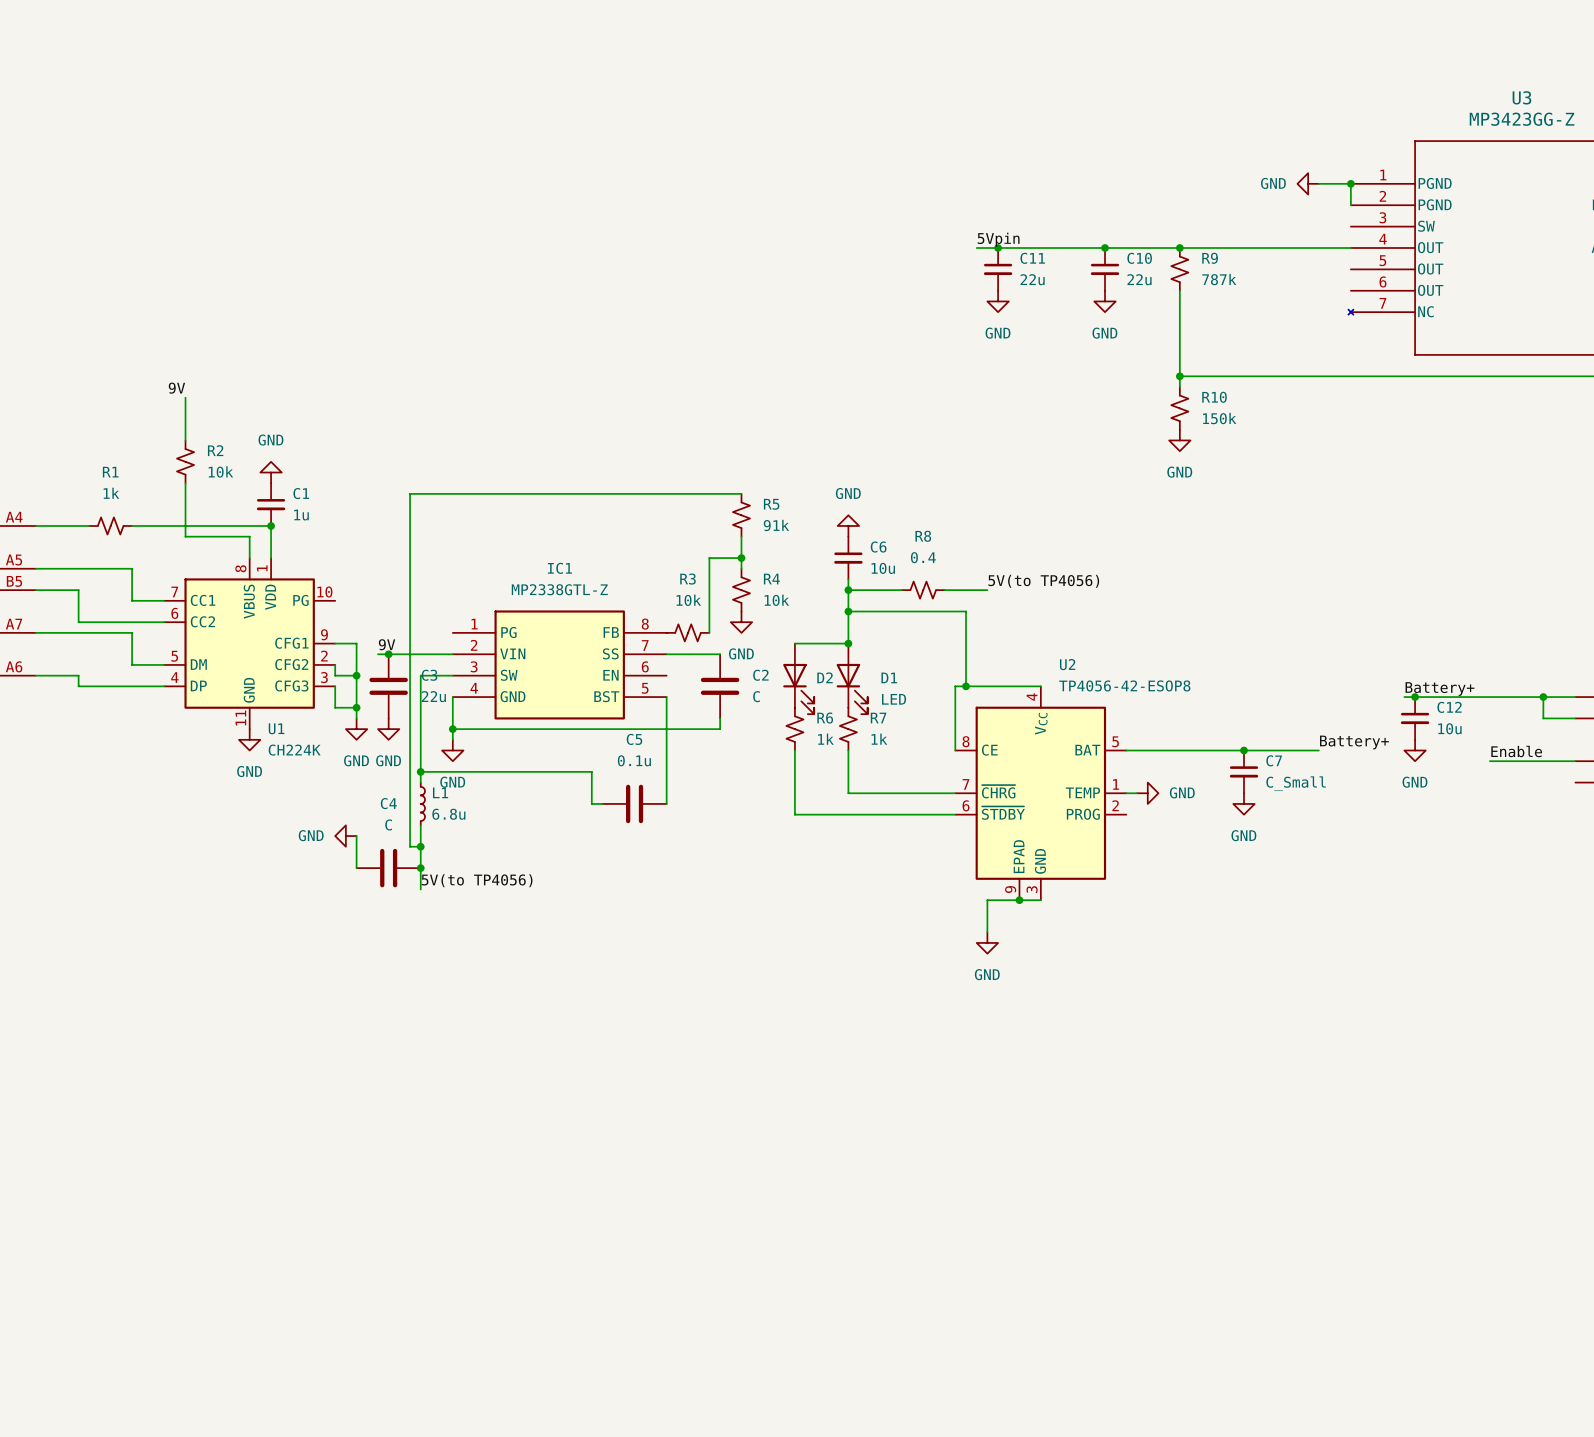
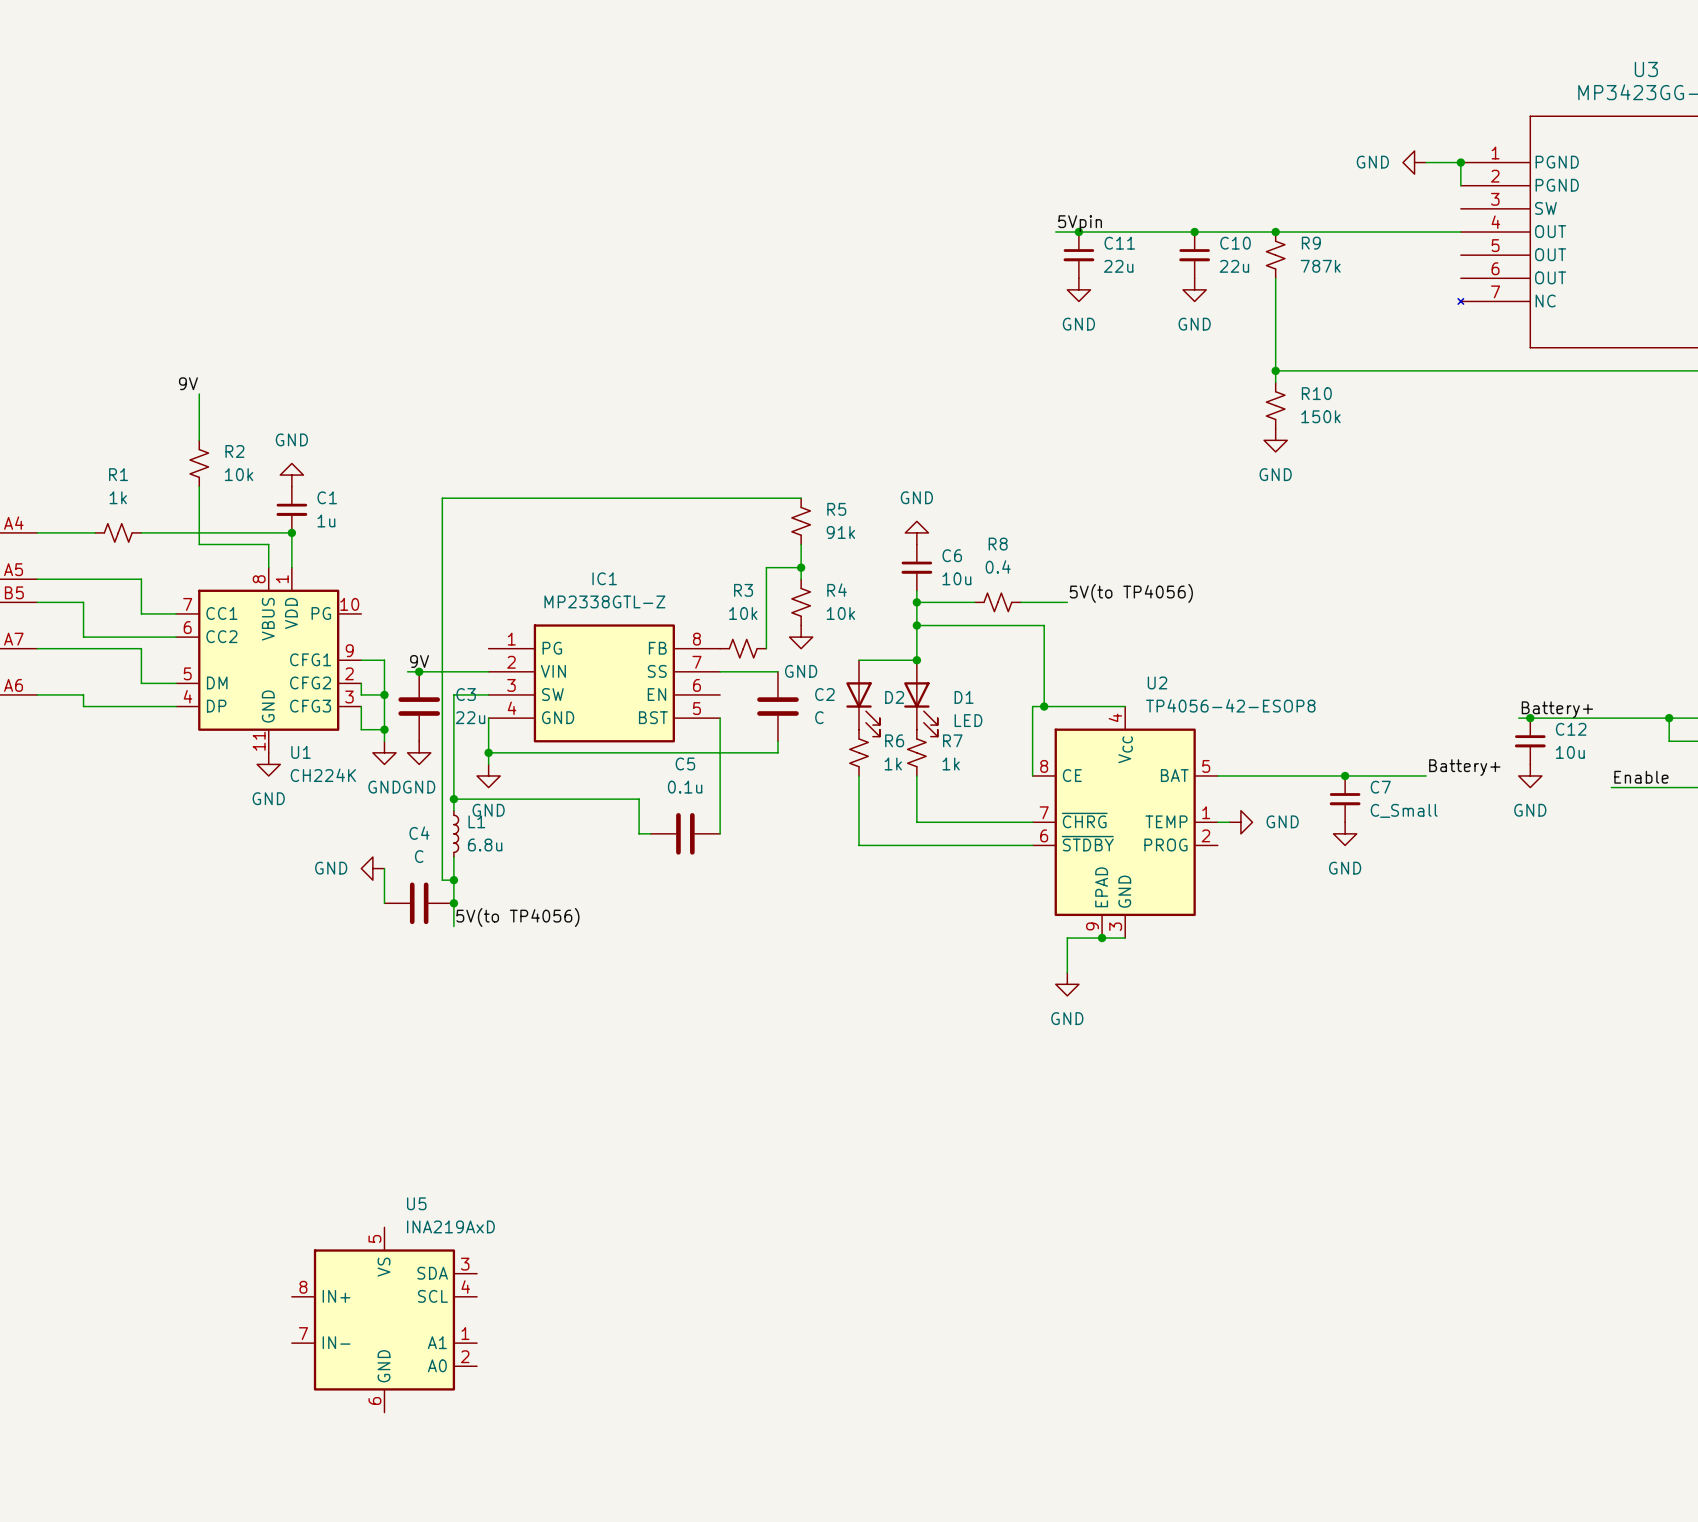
U5: none -> INA219AxD (384, 1319)

